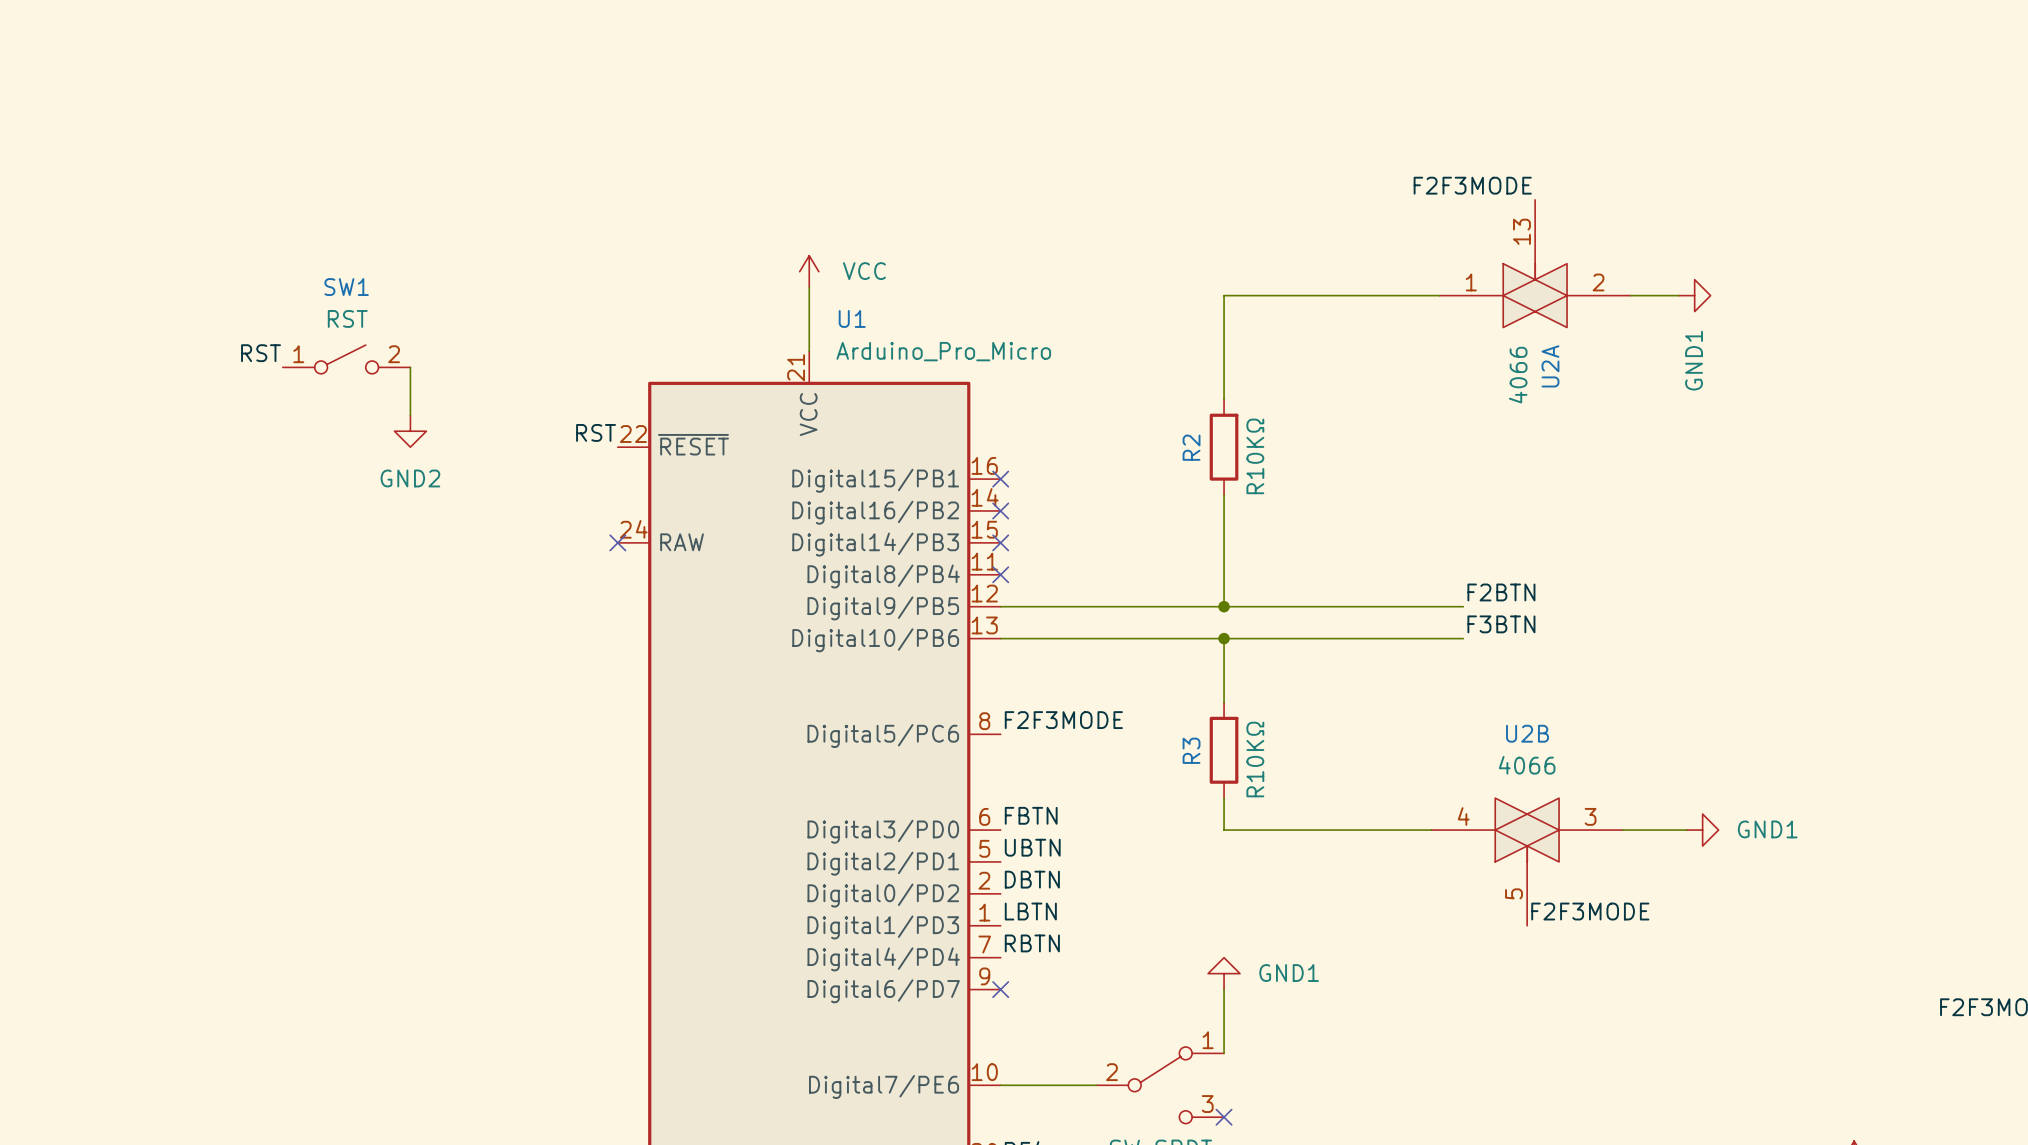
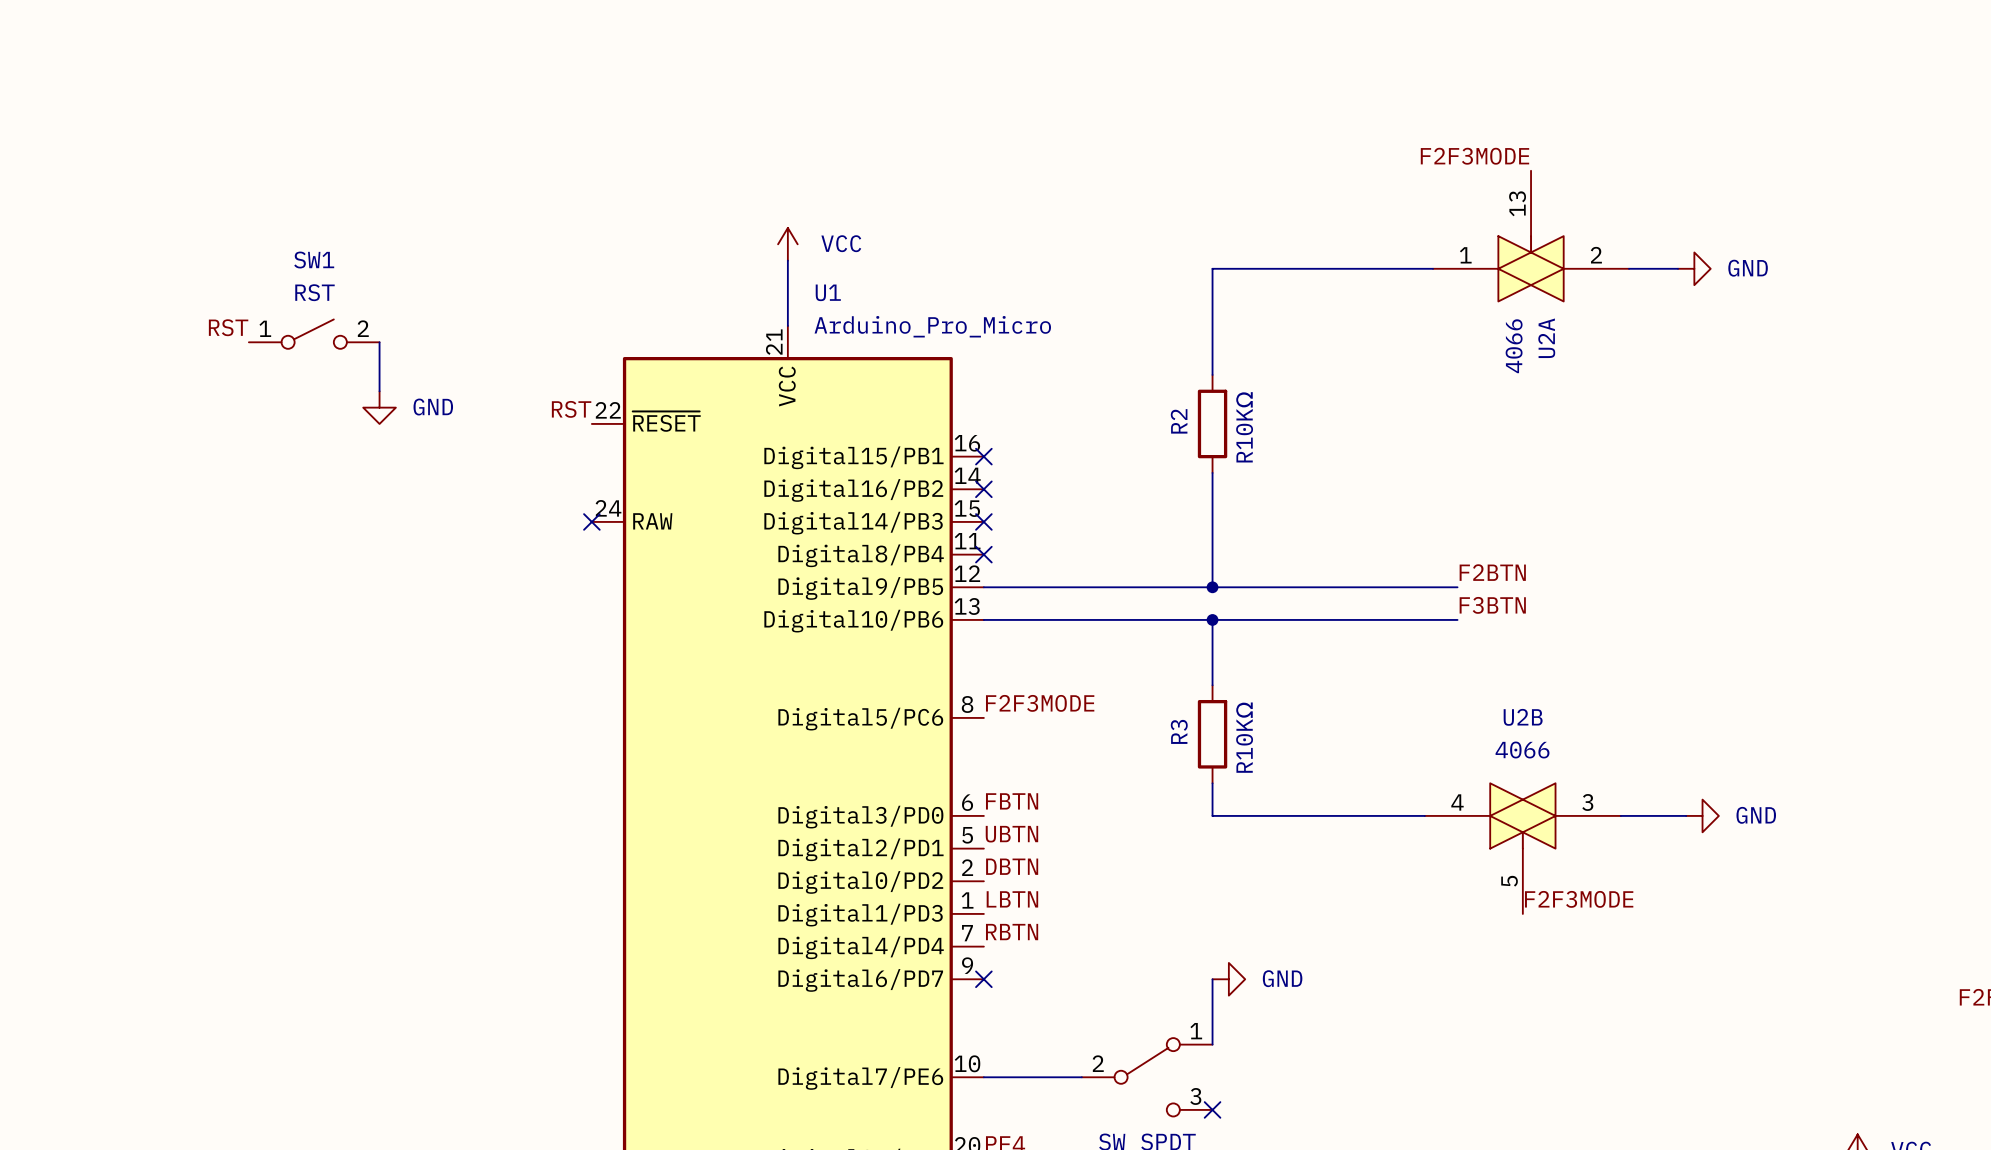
power symbol: GND1 (1694, 295) -> GND (1694, 268)
power symbol: GND2 (410, 431) -> GND (379, 407)
power symbol: GND1 (1702, 830) -> GND (1702, 815)
power symbol: GND1 (1224, 973) -> none
power symbol: none -> GND (1228, 979)

